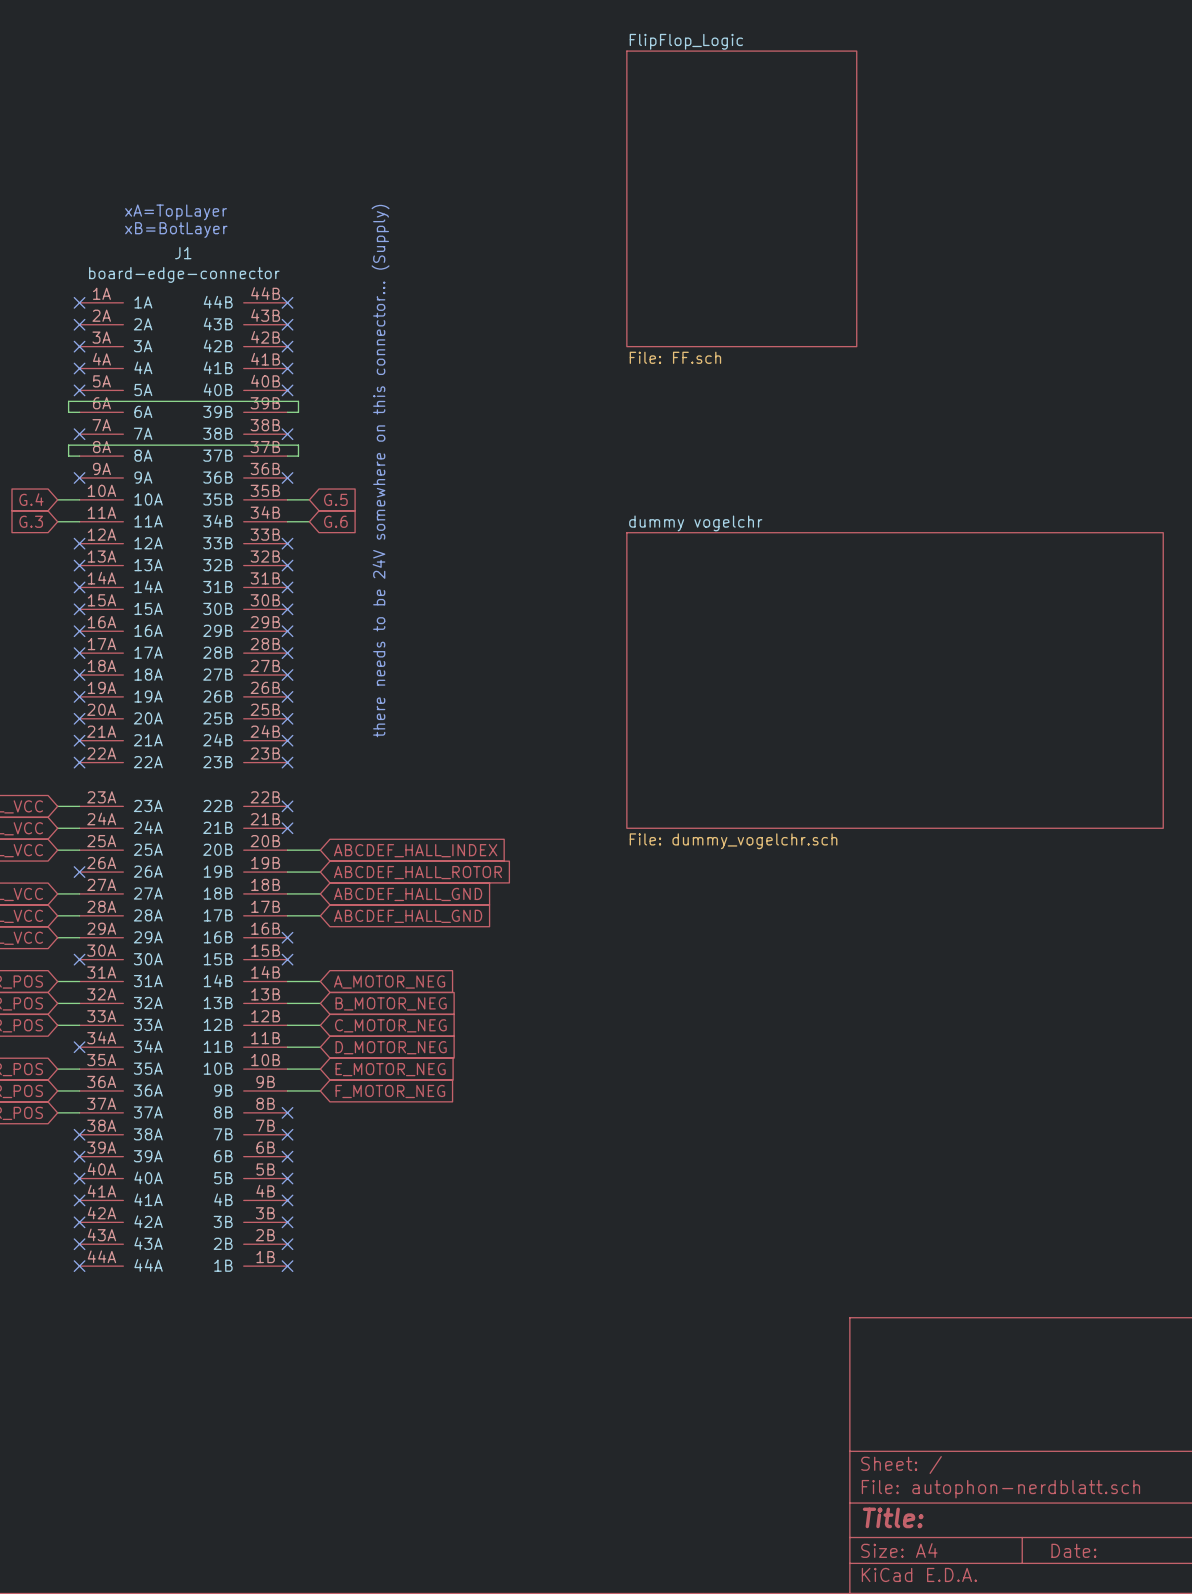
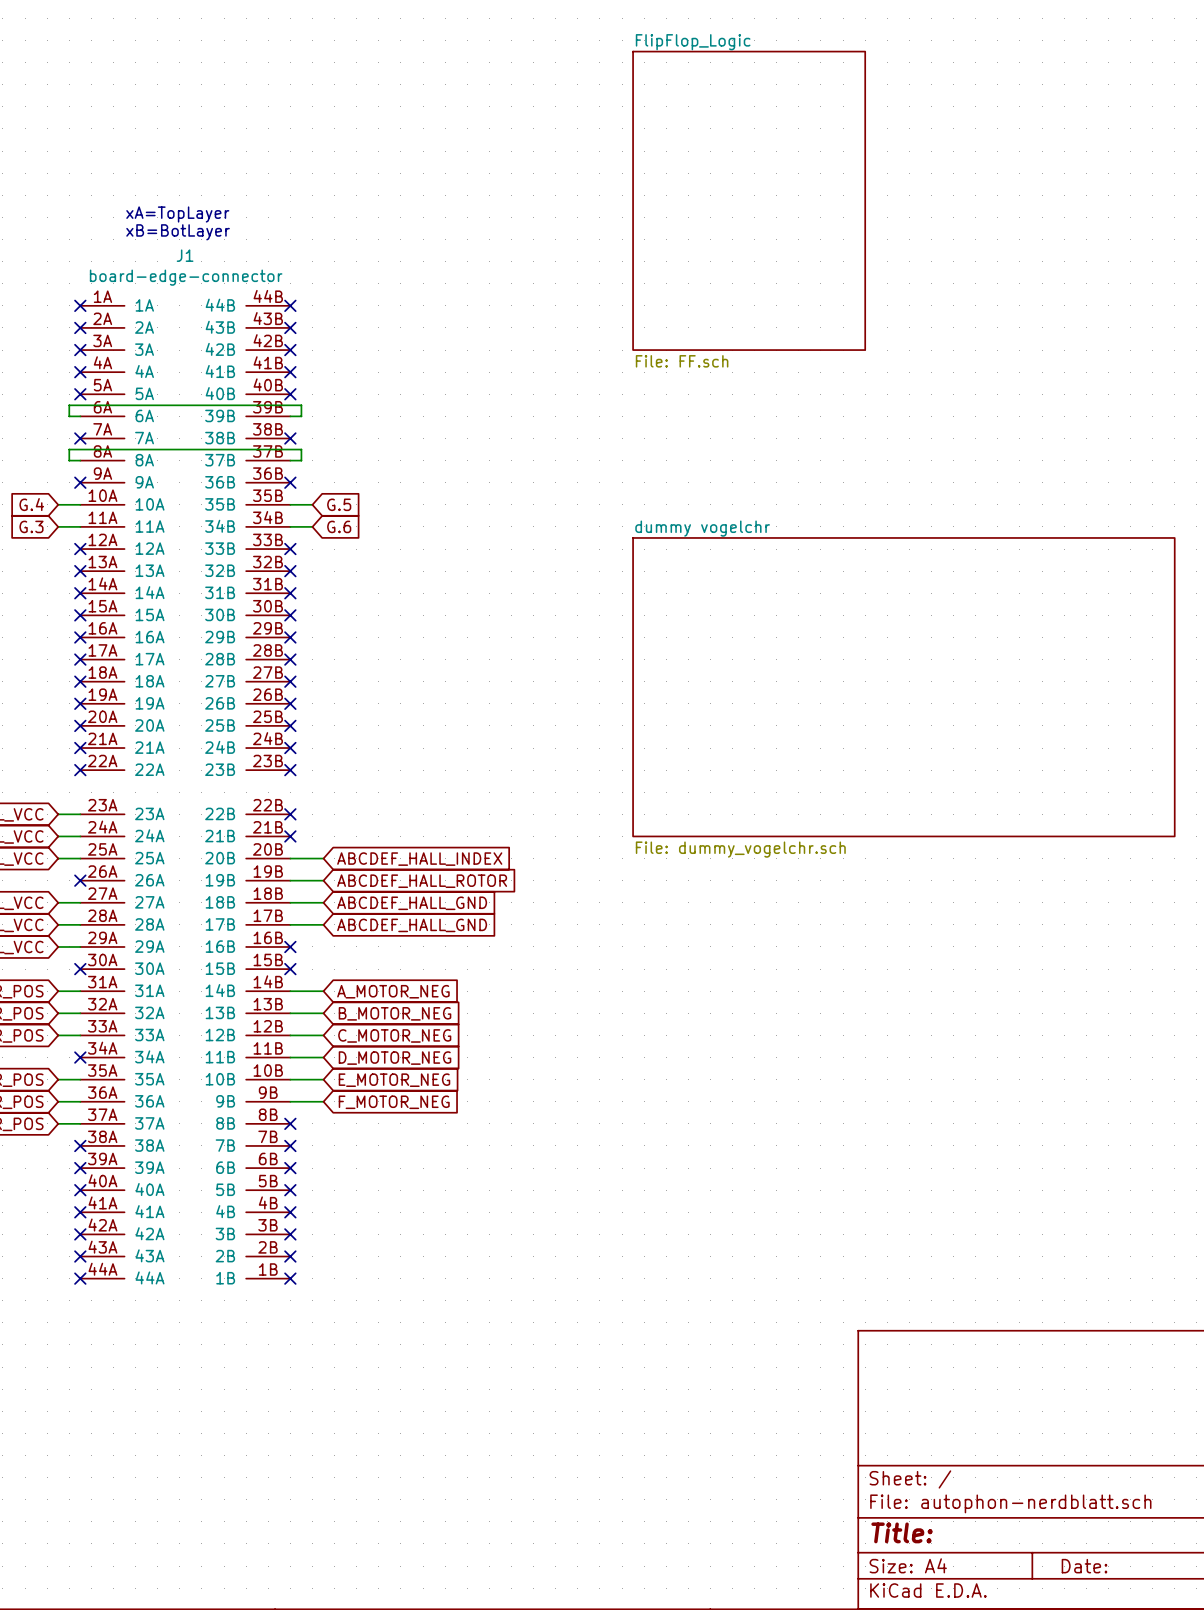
text: there needs to be 24V somewhere on this connector... (Supply) (380, 471) -> none

